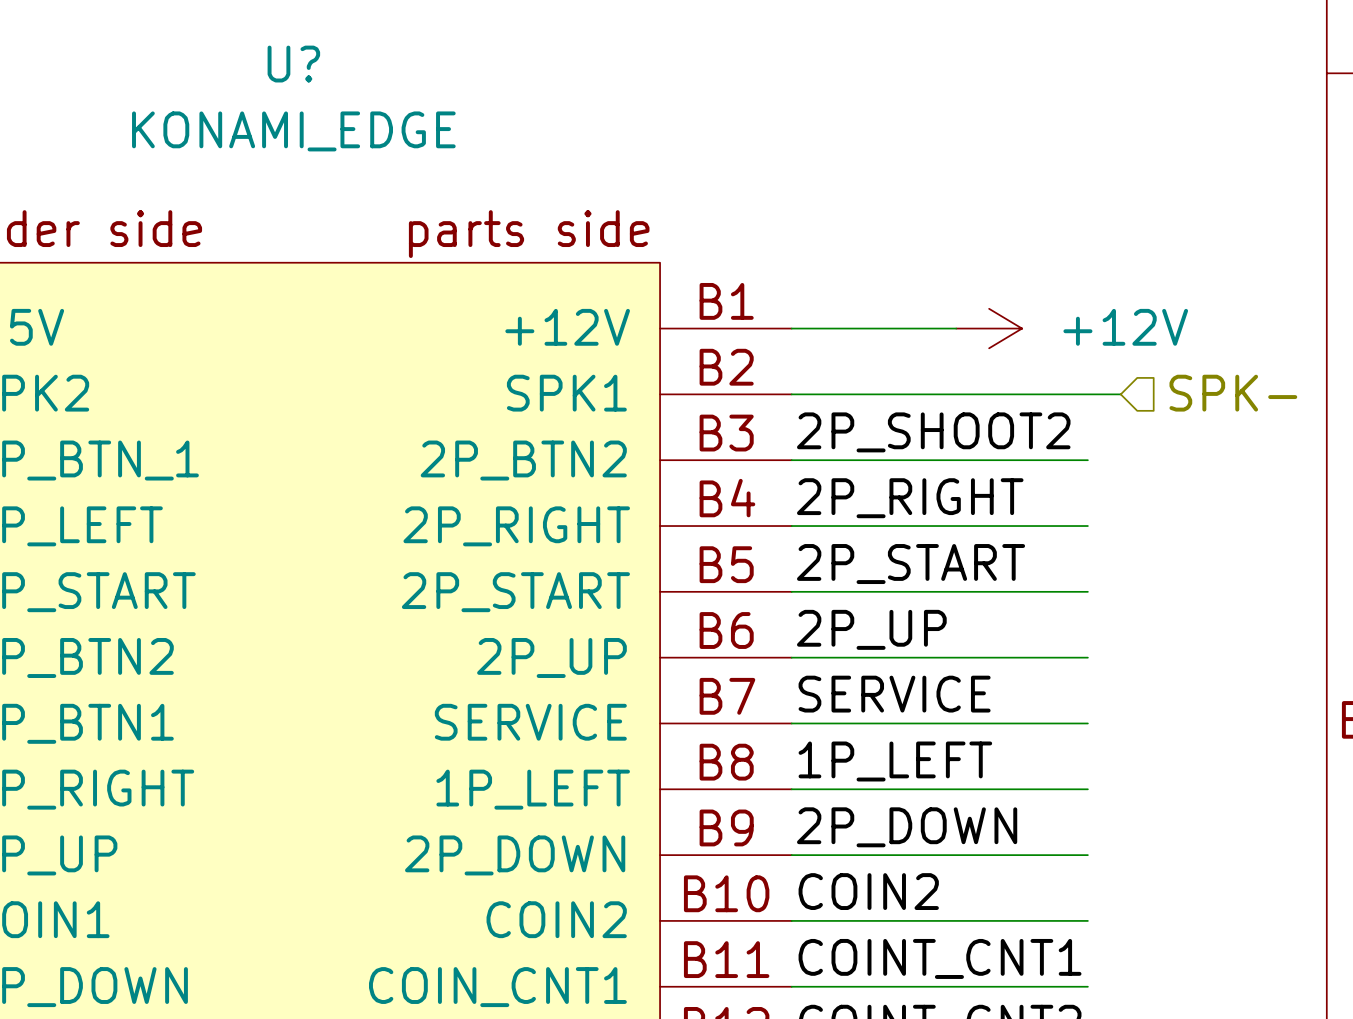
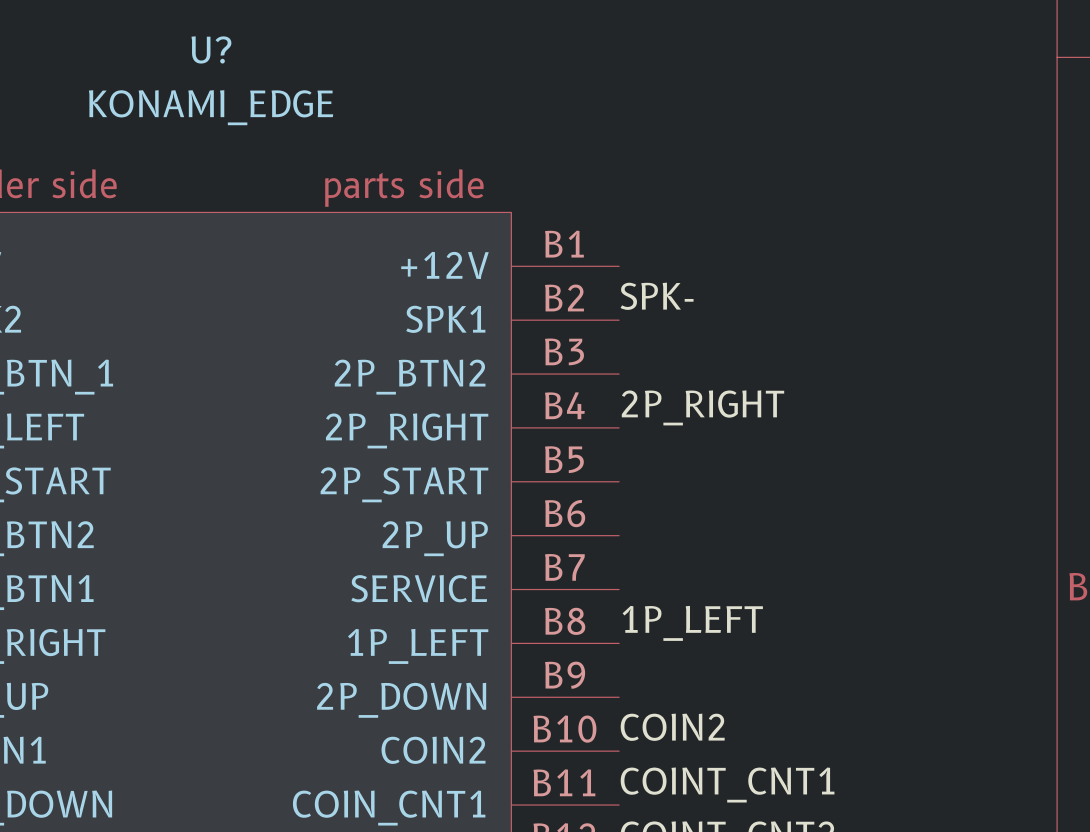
wire: (791, 328) (956, 328) -> none
power symbol: +12V (989, 328) -> none
label: none -> SPK- (657, 296)
hierarchical label: SPK- (1233, 393) -> none
wire: (791, 394) (1120, 394) -> none
label: 2P_SHOOT2 (933, 432) -> none
wire: (791, 460) (1087, 460) -> none
wire: (791, 526) (1087, 526) -> none
label: 2P_START (911, 564) -> none
wire: (791, 591) (1087, 591) -> none
label: 2P_UP (871, 629) -> none
wire: (791, 657) (1087, 657) -> none
label: SERVICE (894, 694) -> none
wire: (791, 723) (1087, 723) -> none
wire: (791, 789) (1087, 789) -> none
label: 2P_DOWN (907, 827) -> none
wire: (791, 855) (1087, 855) -> none
wire: (791, 920) (1087, 920) -> none
wire: (791, 986) (1087, 986) -> none

